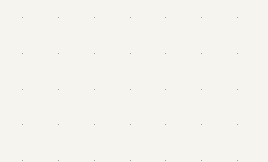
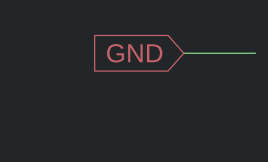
global label: none -> GND (134, 53)
wire: none -> (183, 53) (255, 53)

